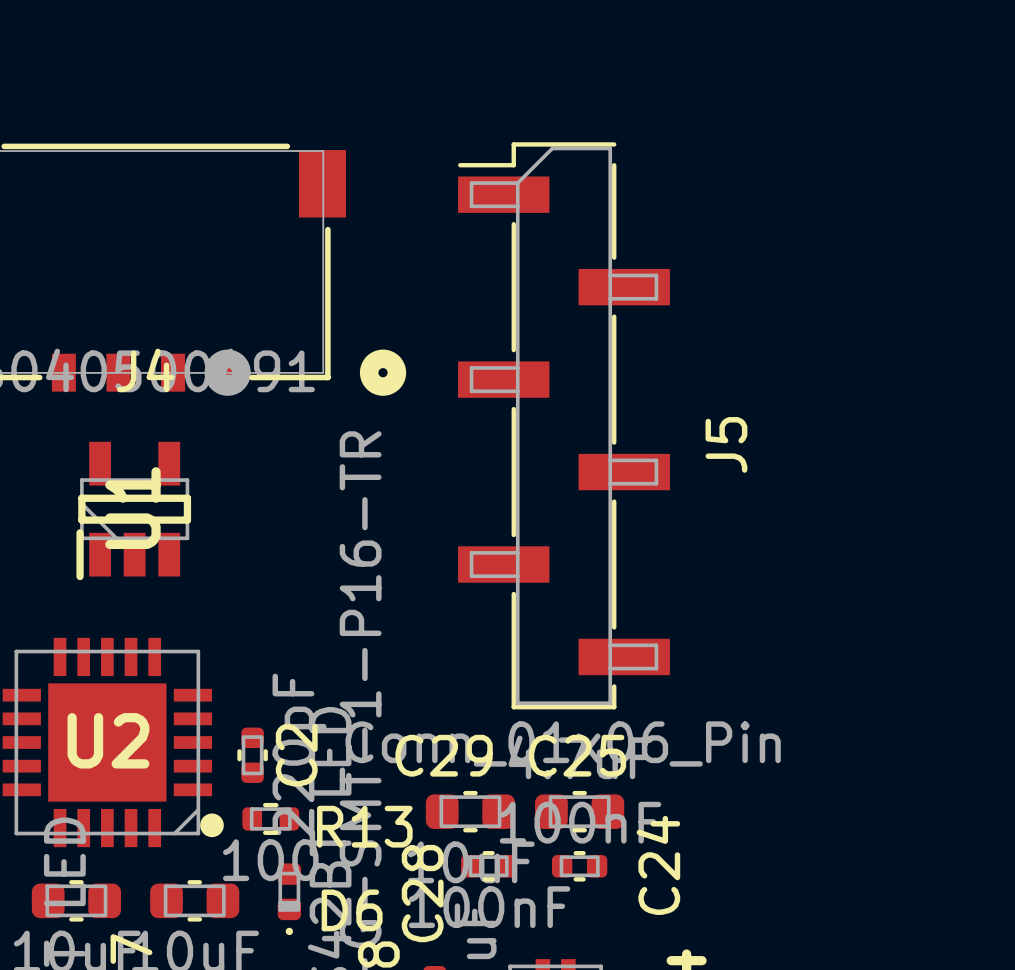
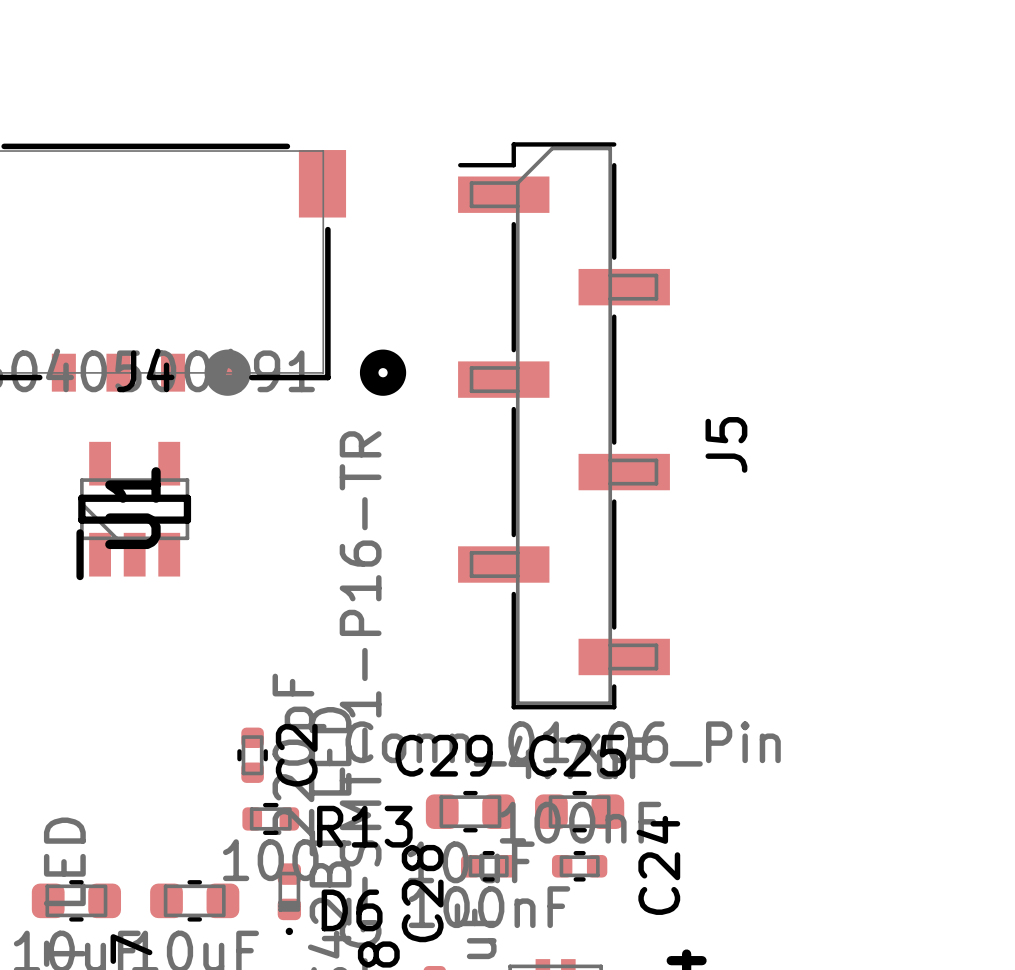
U2: (113, 742) -> none

